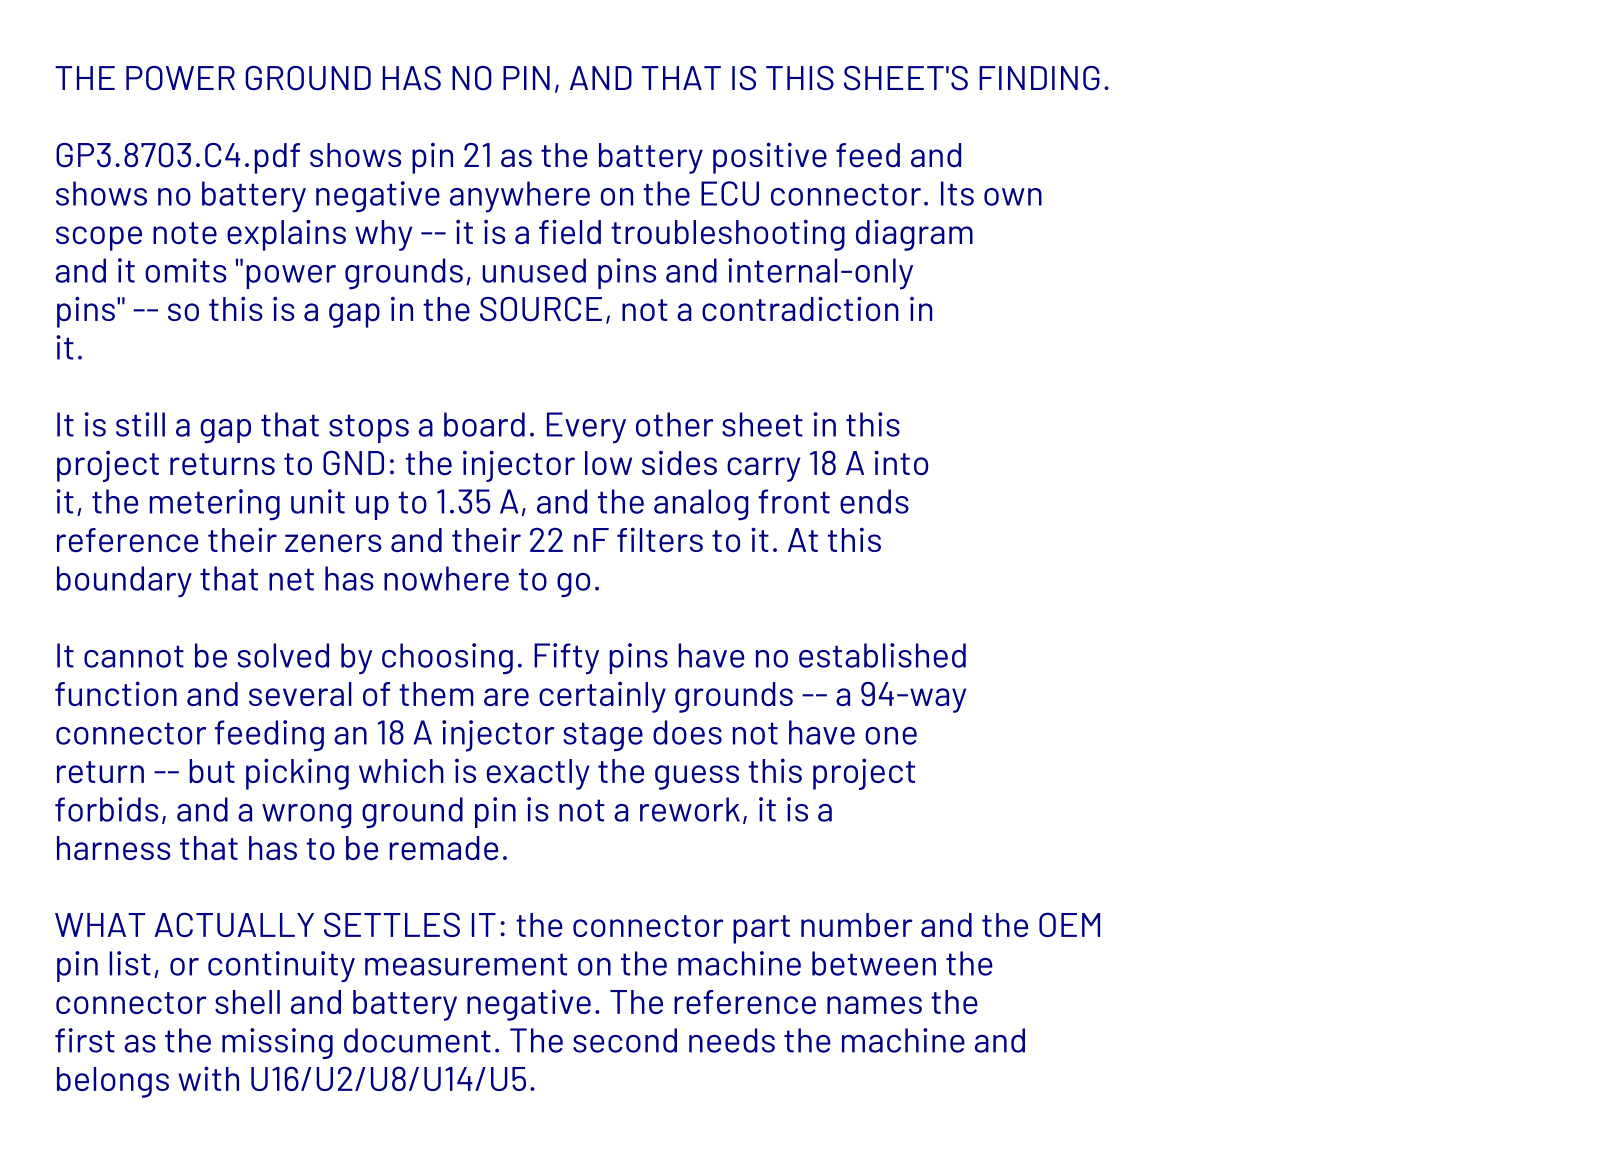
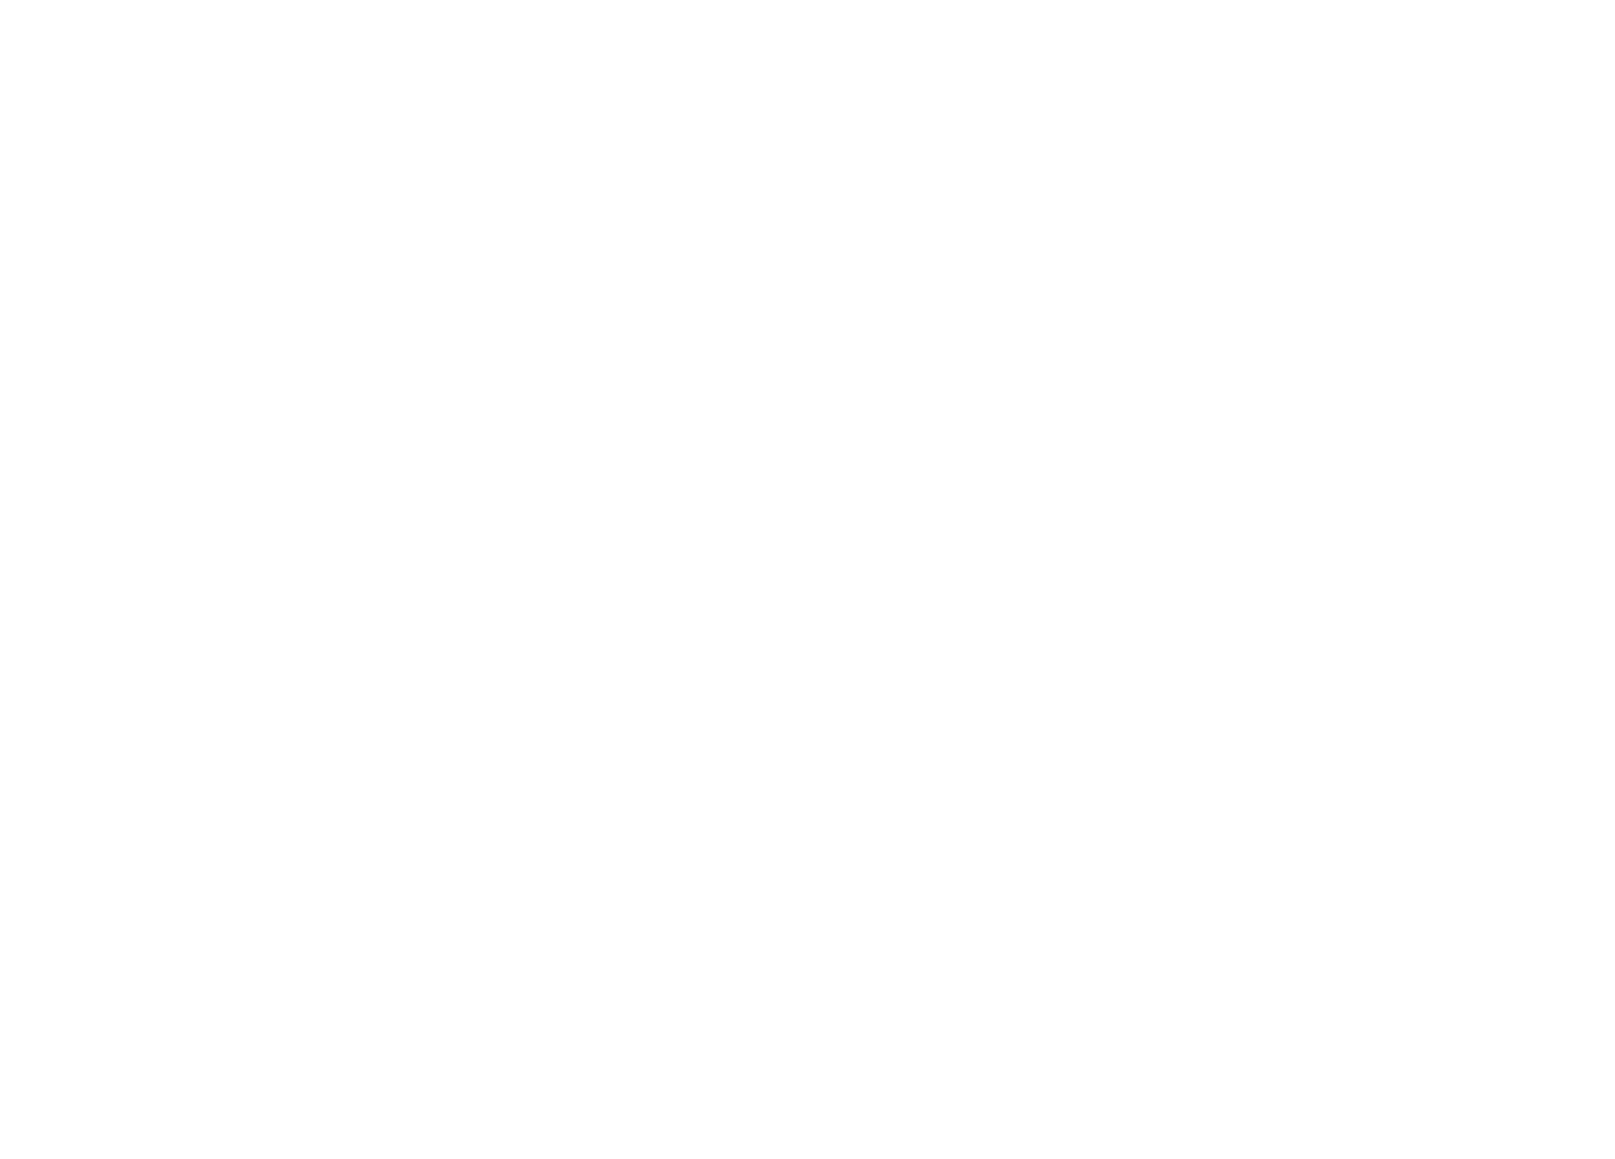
text: THE POWER GROUND HAS NO PIN, AND THAT IS THIS SHEET'S FINDING. (582, 79) -> none
text: GP3.8703.C4.pdf shows pin 21 as the battery positive feed and (508, 158) -> none
text: shows no battery negative anywhere on the ECU connector. Its own (548, 196) -> none
text: scope note explains why -- it is a field troubleshooting diagram (514, 235) -> none
text: and it omits "power grounds, unused pins and internal-only (484, 273) -> none
text: pins" -- so this is a gap in the SOURCE, not a contradiction in (494, 312) -> none
text: it. (69, 347) -> none
text: It is still a gap that stops a board. Every other sheet in this (478, 427) -> none
text: project returns to GND: the injector low sides carry 18 A into (492, 466) -> none
text: it, the metering unit up to 1.35 A, and the analog front ends (482, 504) -> none
text: reference their zeners and their 22 nF filters to it. At this (468, 539) -> none
text: boundary that net has nowhere to go. (327, 581) -> none
text: It cannot be solved by choosing. Fifty pins have no established (511, 658) -> none
text: function and several of them are certainly grounds -- a 94-way (510, 697) -> none
text: connector feeding an 18 A injector stage does not have one (486, 735) -> none
text: return -- but picking which is exactly the guess this project (485, 774) -> none
text: forbids, and a wrong ground pin is not a rework, it is a (443, 812) -> none
text: harness that has to be remade. (281, 848) -> none
text: WHAT ACTUALLY SETTLES IT: the connector part number and the OEM (577, 928) -> none
text: pin list, or continuity measurement on the machine between the (524, 966) -> none
text: connector shell and battery negative. The reference names the (516, 1005) -> none
text: first as the missing document. The second needs the machine and (540, 1043) -> none
text: belongs with U16/U2/U8/U14/U5. (295, 1082) -> none

